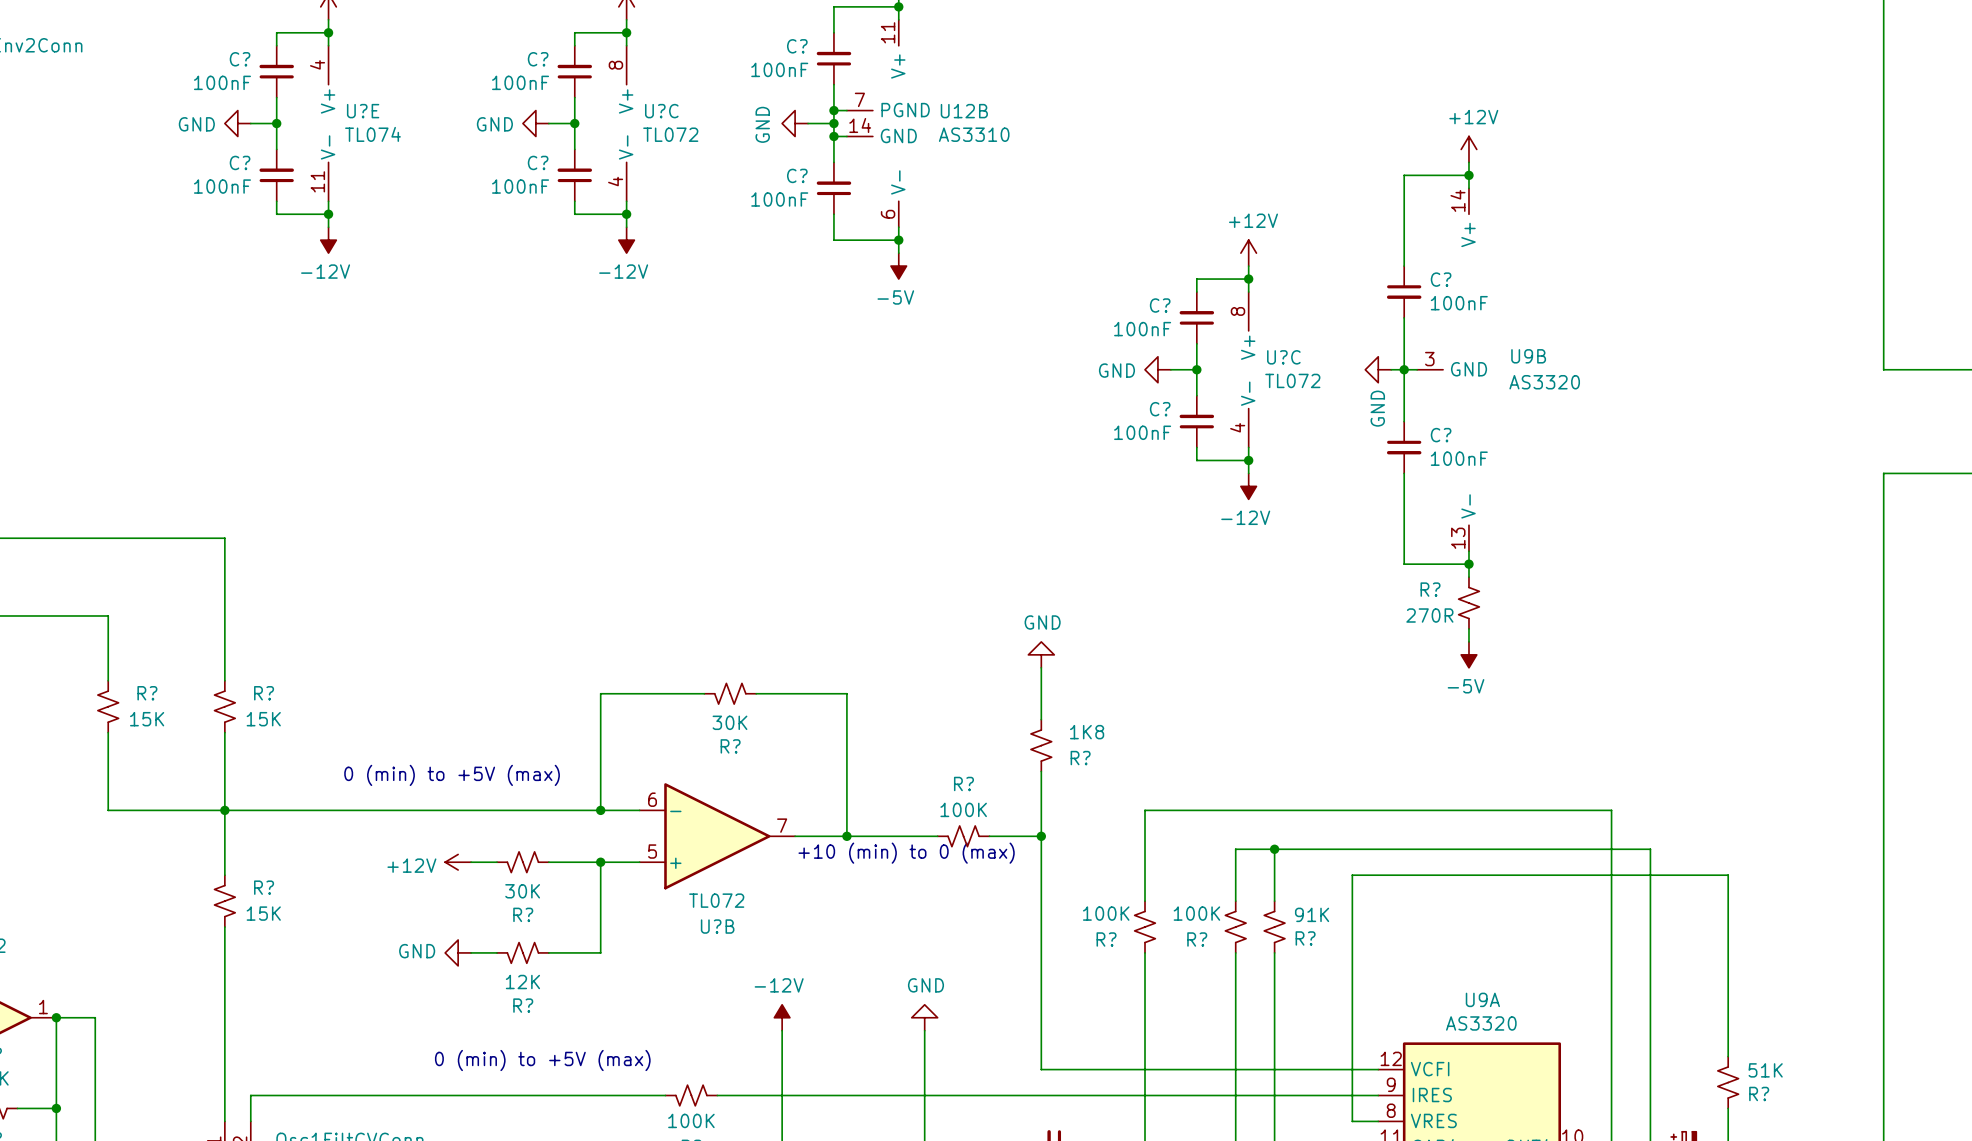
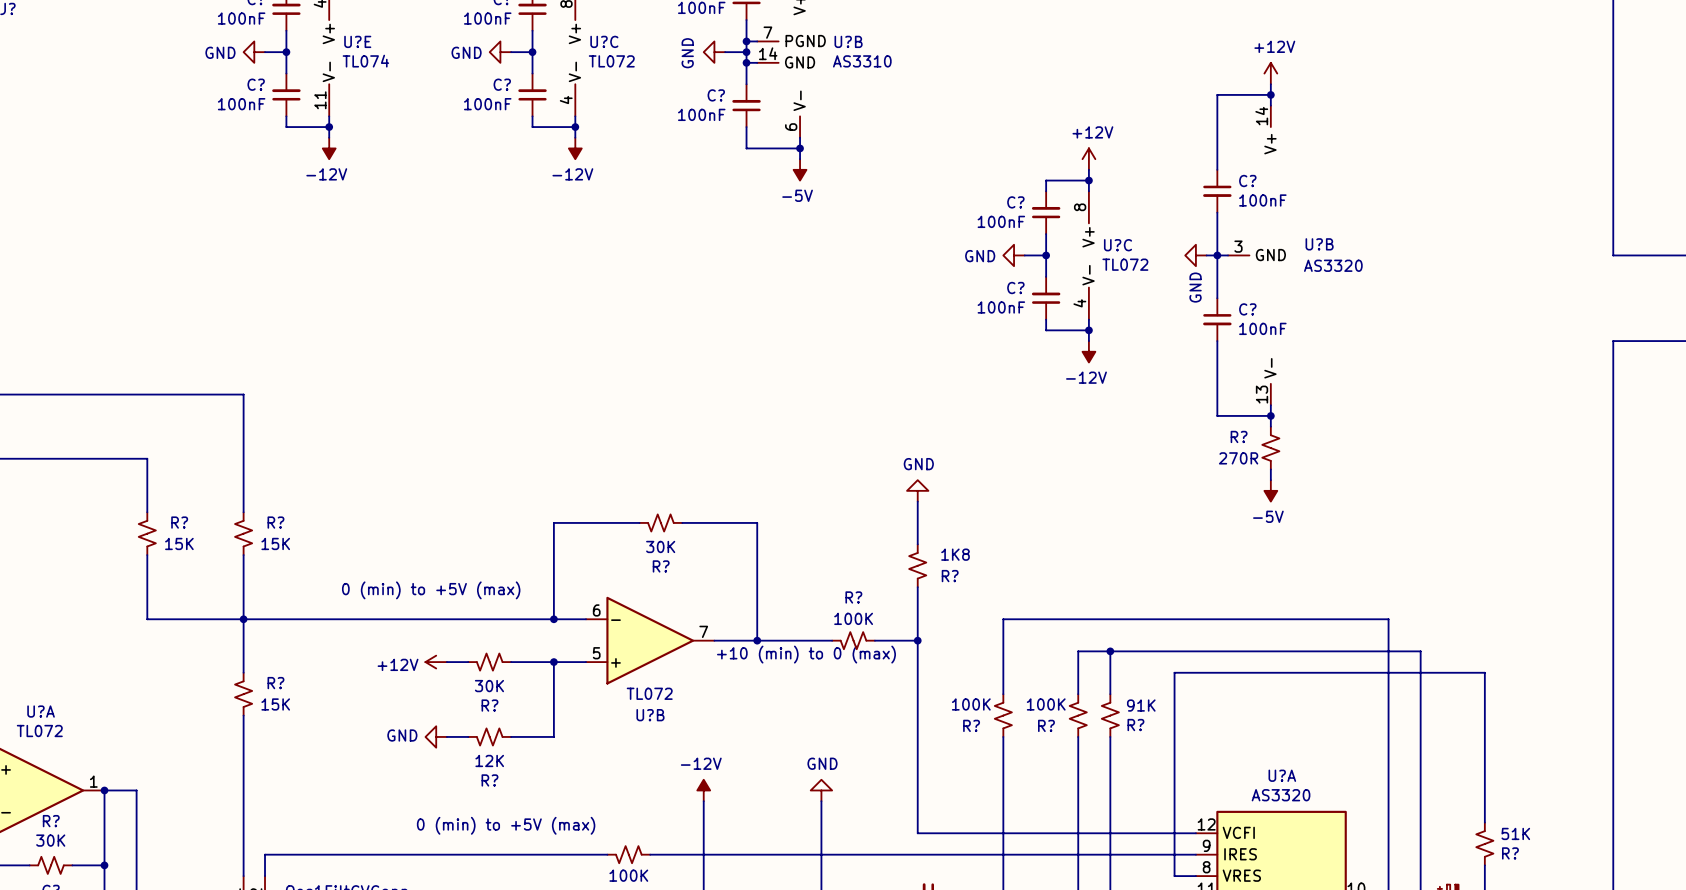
U12B name: U12B (964, 111) -> U?B (848, 41)
U9B name: U9B (1528, 356) -> U?B (1319, 244)
U9A name: U9A (1482, 999) -> U?A (1282, 775)

